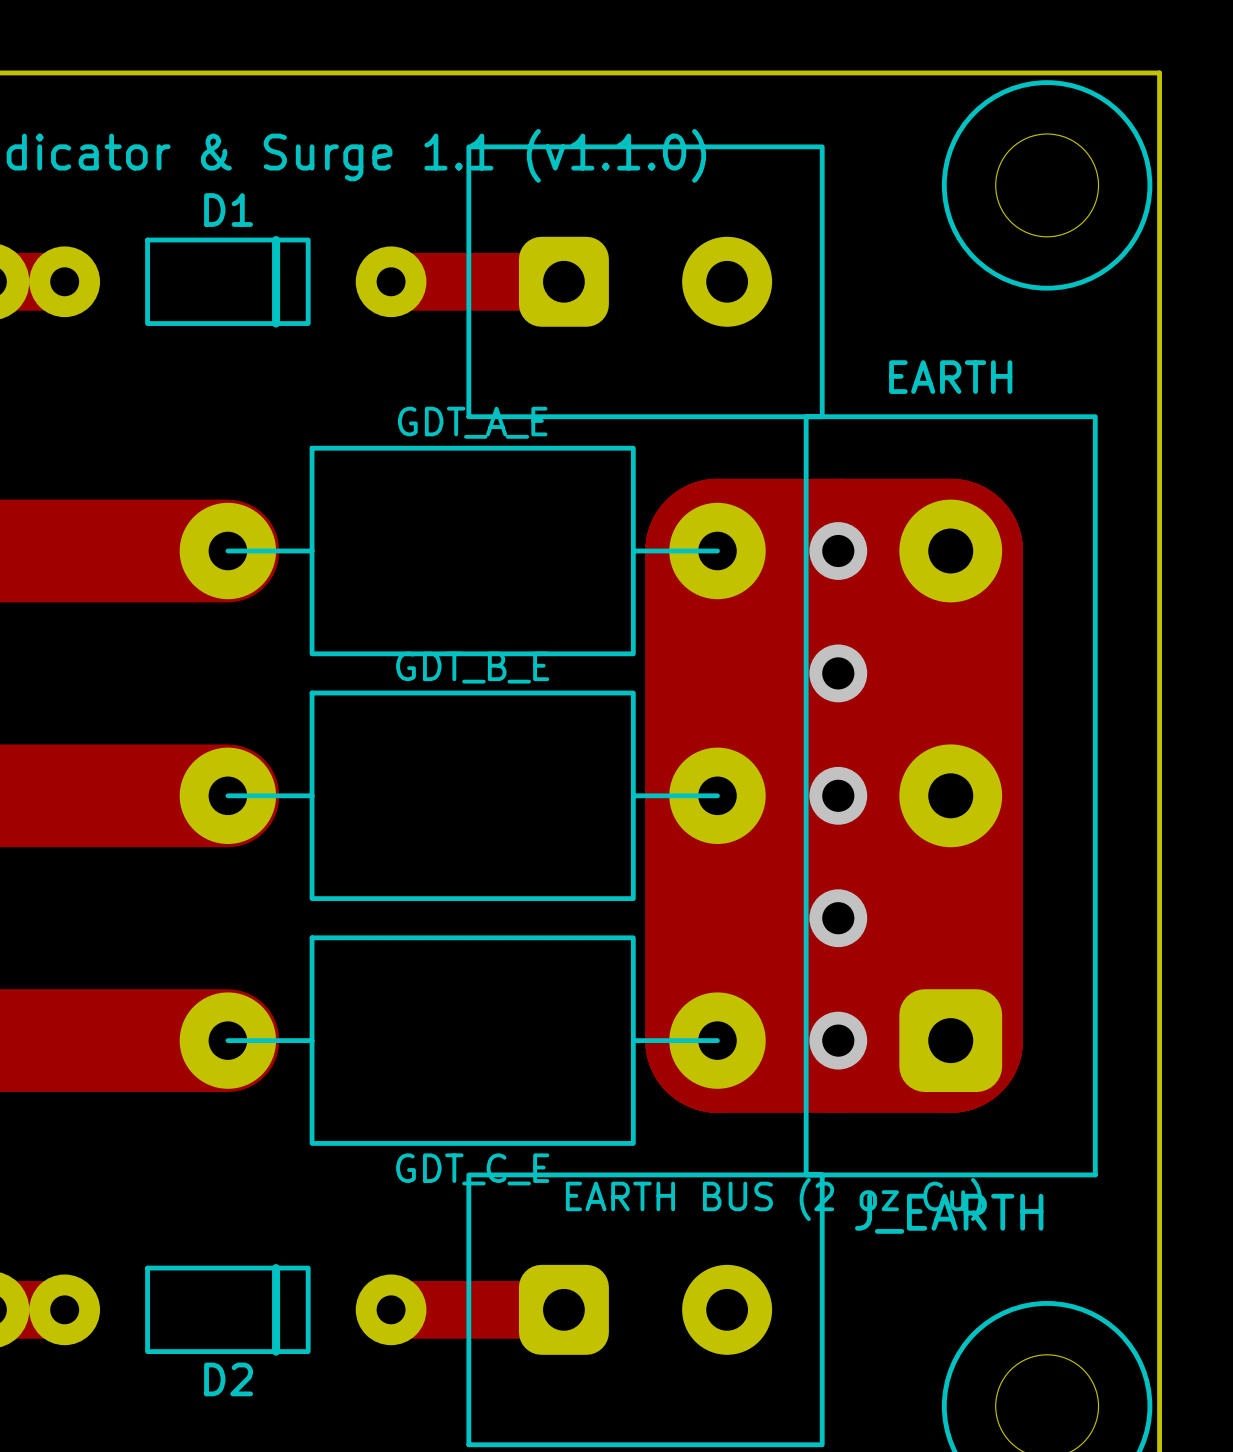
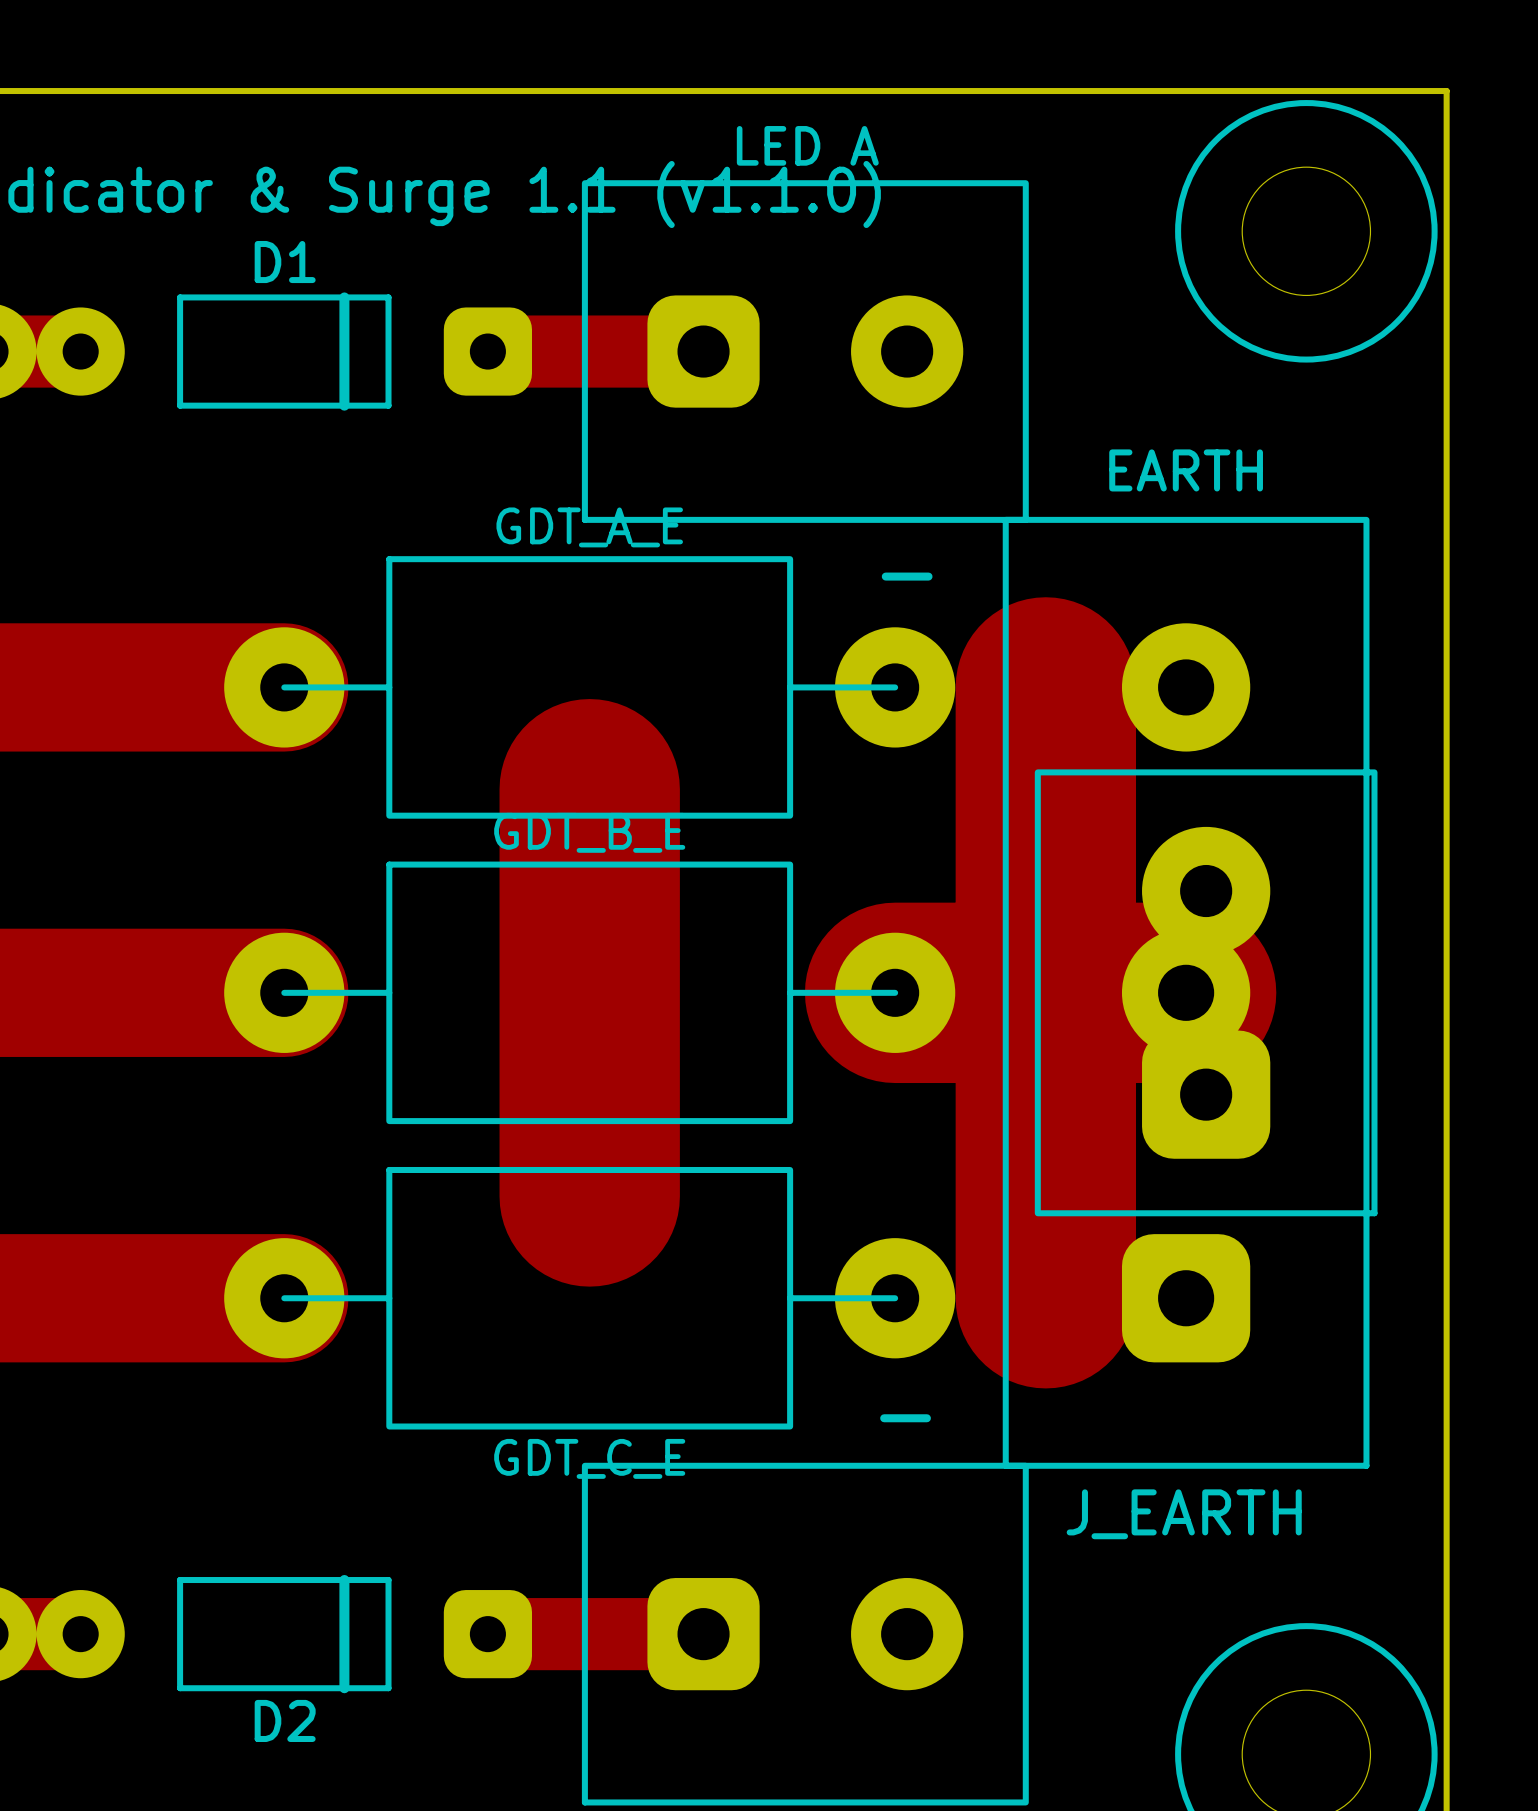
text: none -> LED A (807, 145)
D1 footprint: [29, 236, 427, 328] -> [36, 292, 532, 411]
text: none -> - (907, 576)
track: (717, 551) (717, 1040) (950, 1040) (950, 551) (717, 551) -> none
via: (838, 551) -> none
track: none -> (589, 789) (589, 1196)
via: (838, 673) -> none
via: (838, 795) -> none
part: none -> (1206, 992)
via: (838, 918) -> none
via: (838, 1040) -> none
text: none -> - (905, 1418)
text: EARTH BUS (2 oz Cu) (774, 1199) -> none
D2 footprint: [29, 1264, 427, 1356] -> [36, 1575, 532, 1694]

